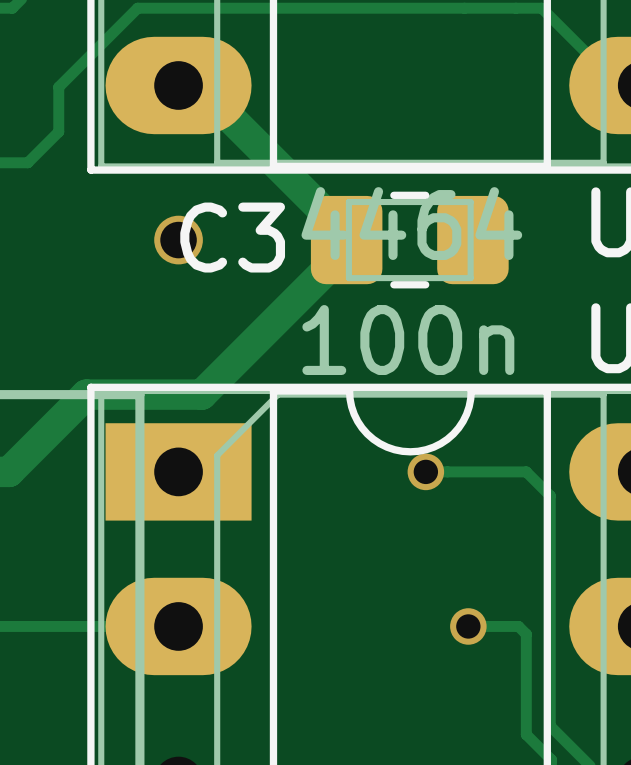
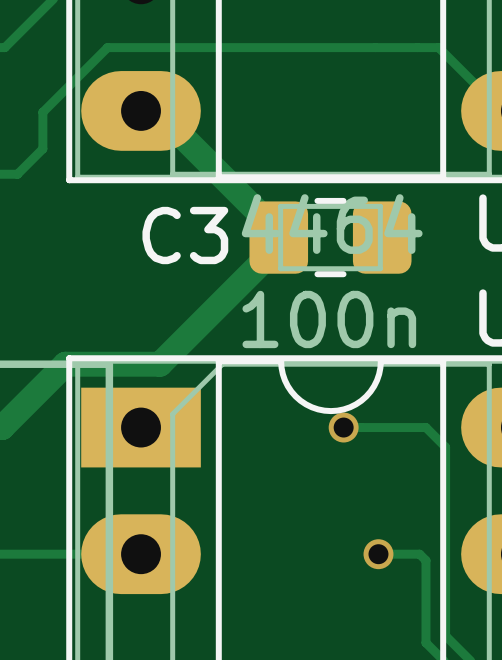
via: (178, 240) -> none

